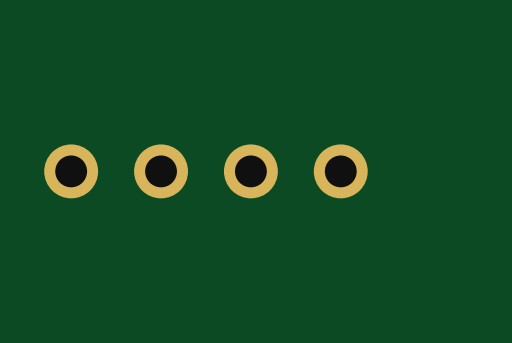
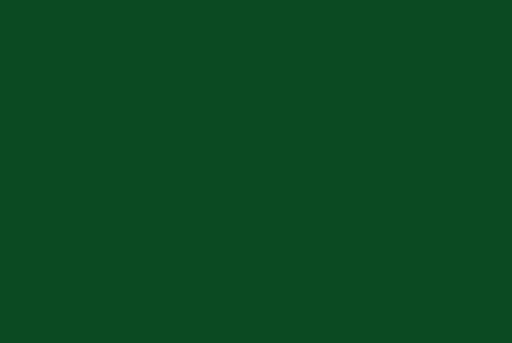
part: (205, 171) -> none

